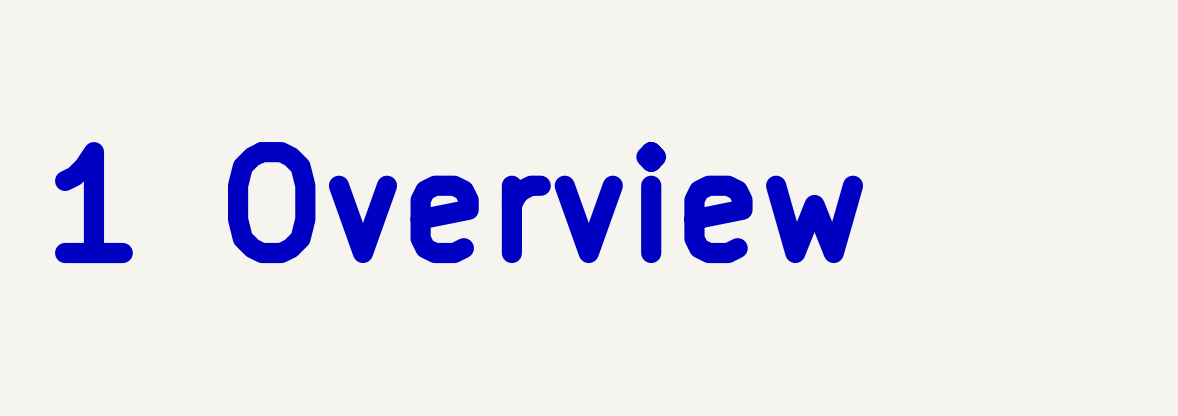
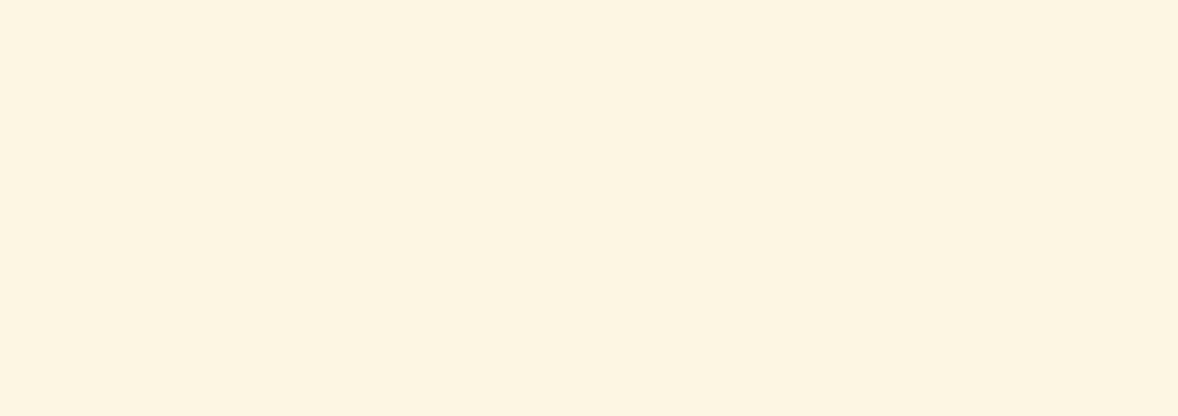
text: 1 Overview (459, 202) -> none

